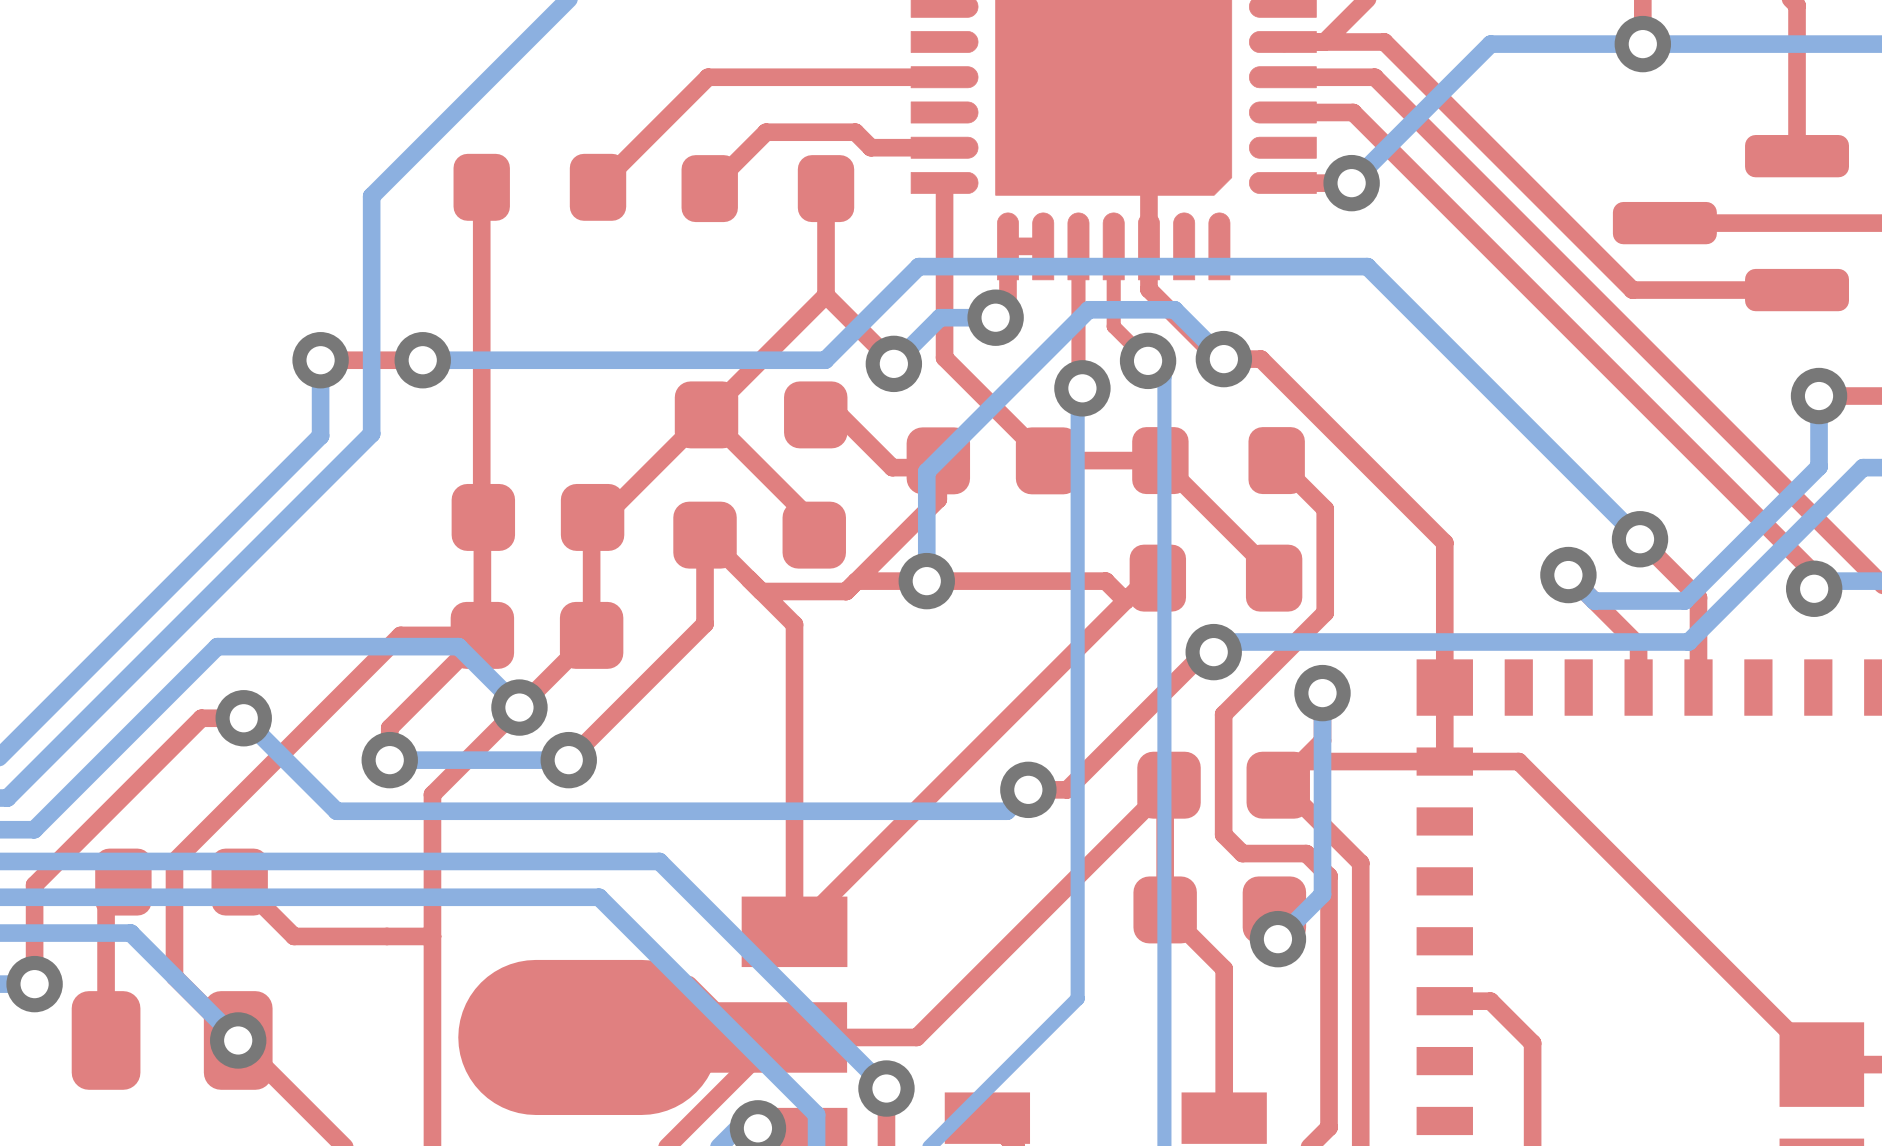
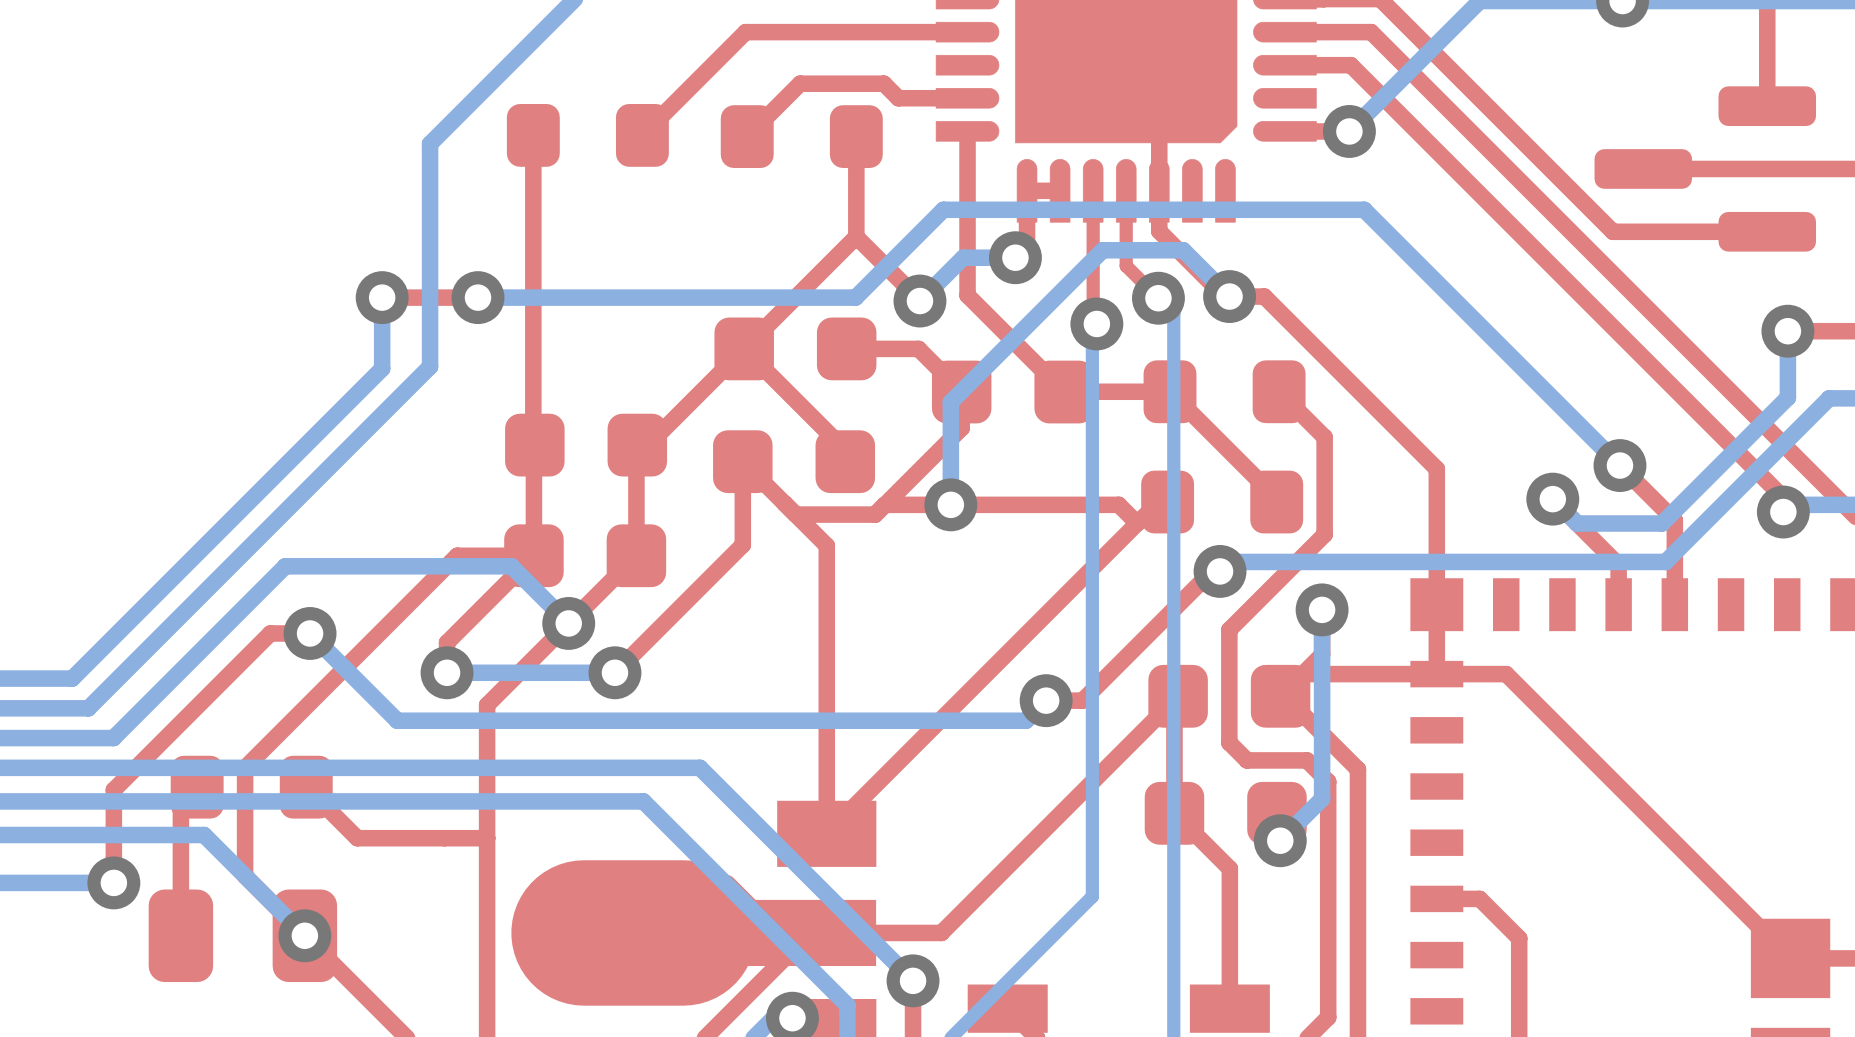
top track: (839, 414) (892, 467) (931, 467) (938, 460) -> (869, 348) (918, 348) (961, 392)

